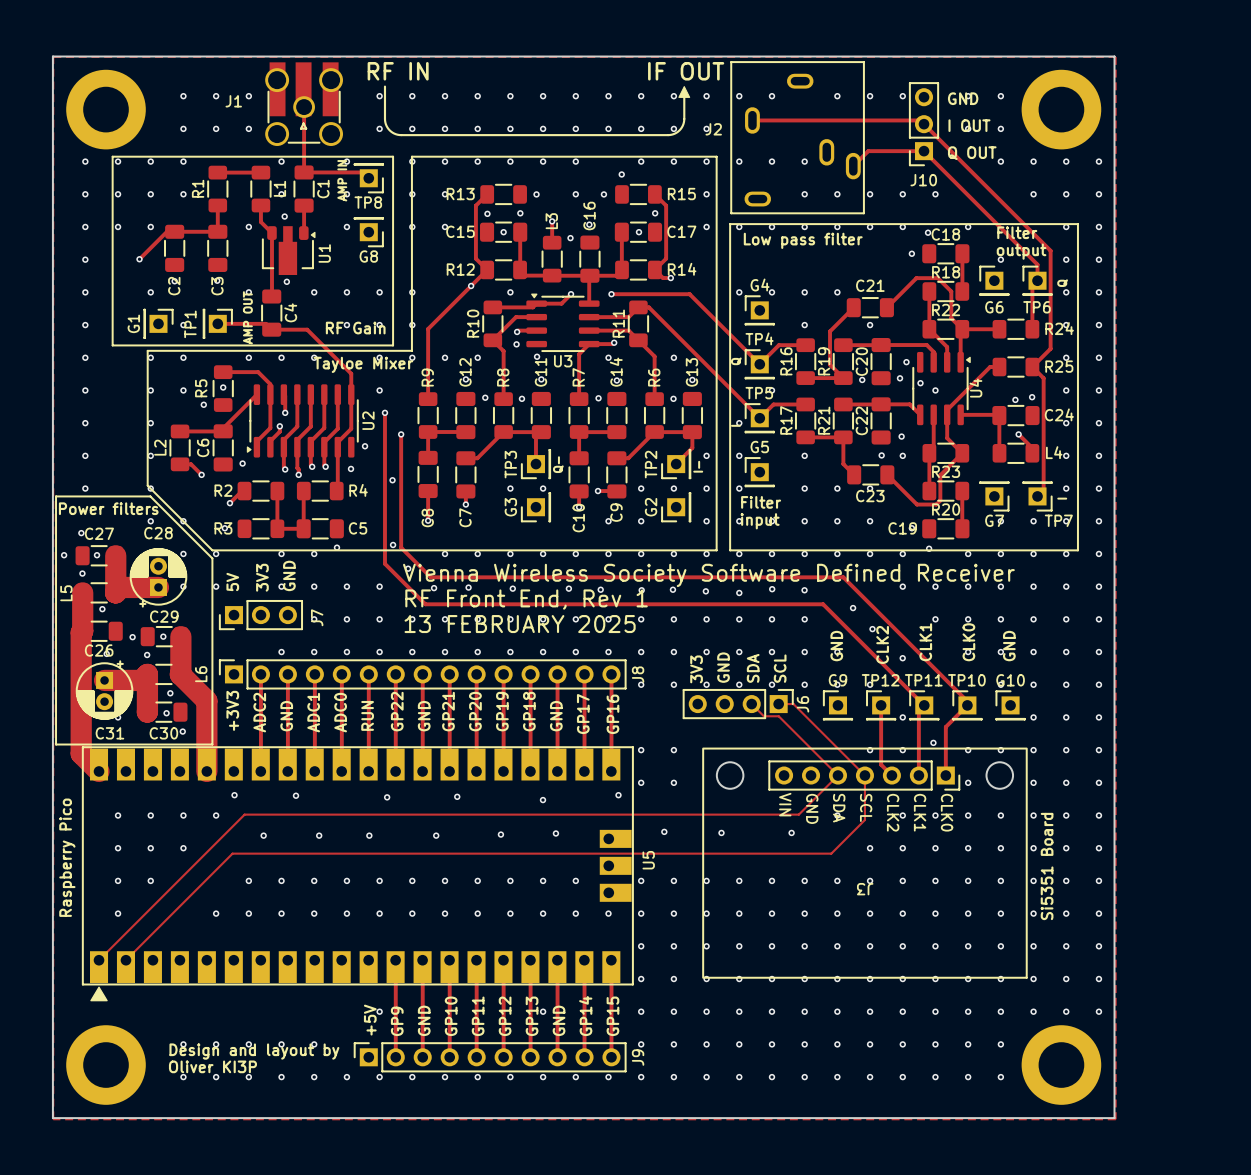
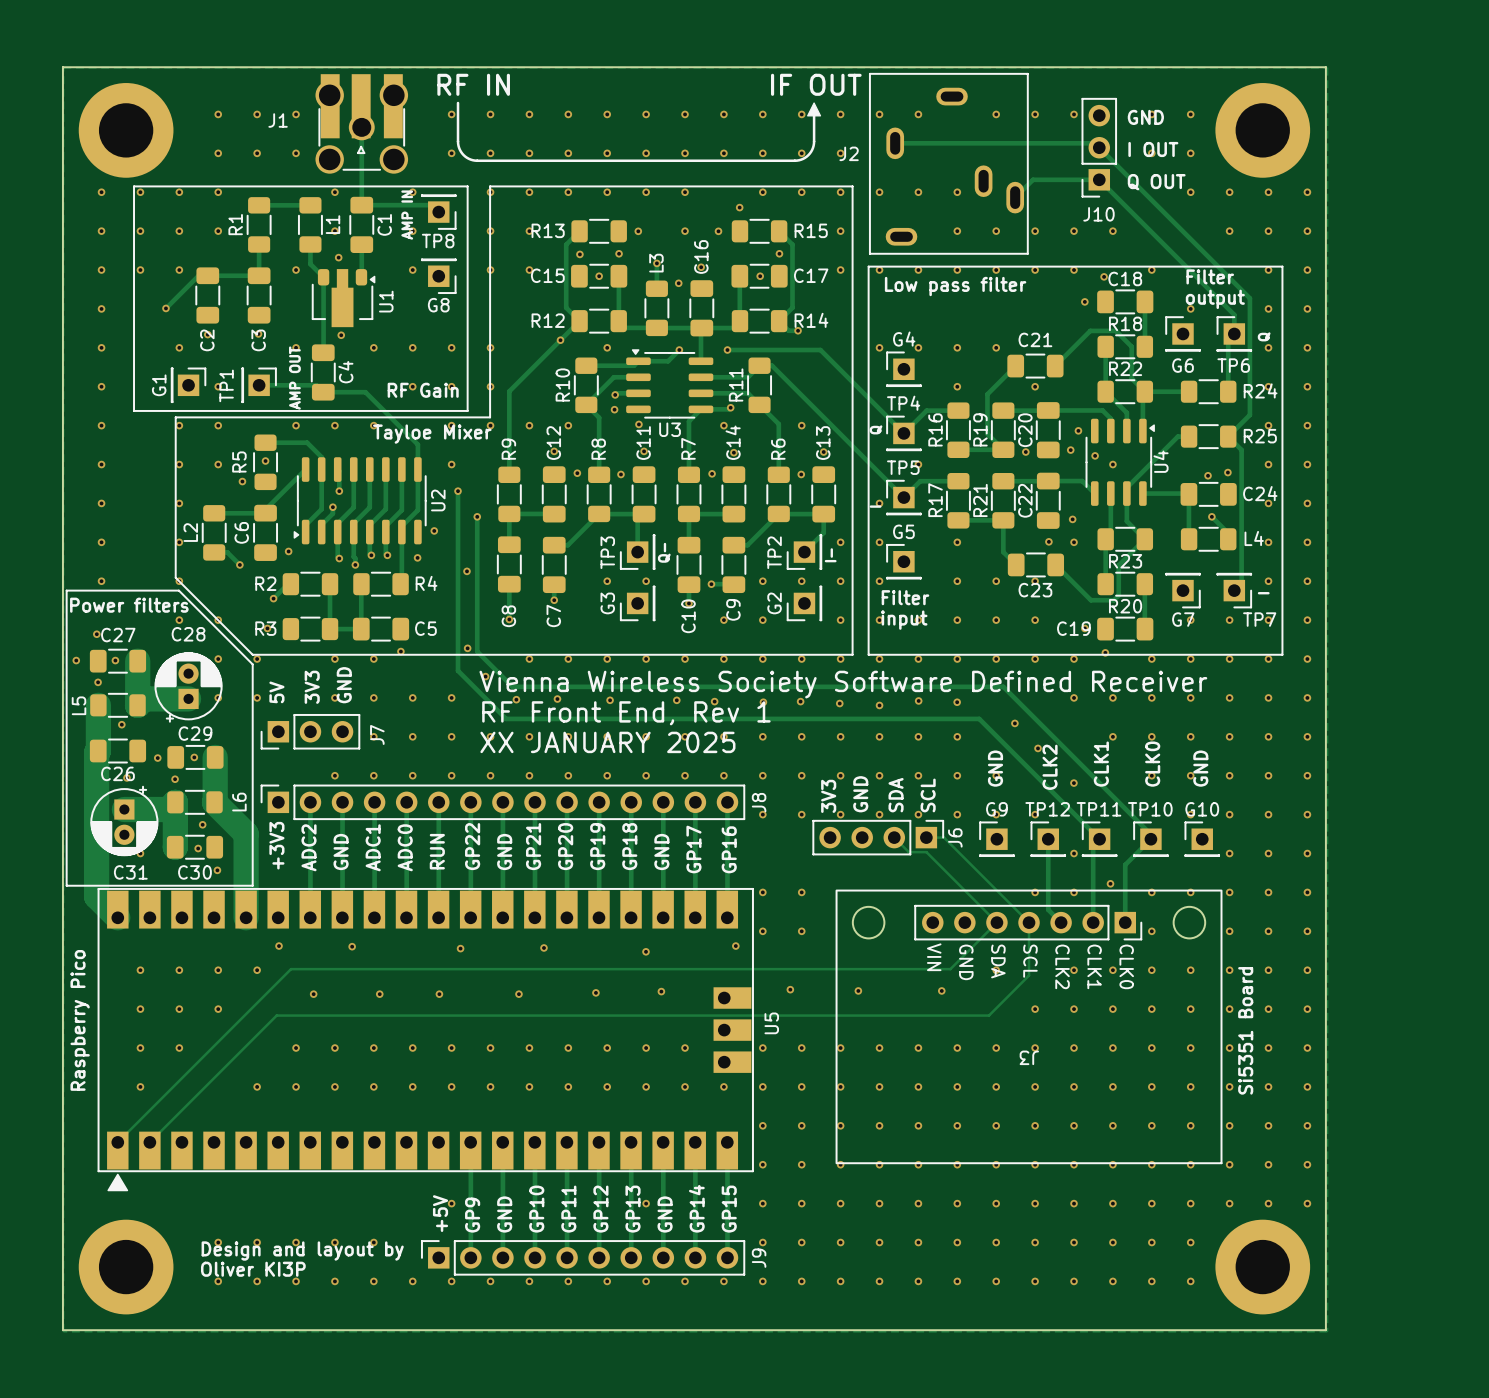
text: 13 FEBRUARY 2025 (520, 624) -> XX JANUARY 2025 (607, 742)

